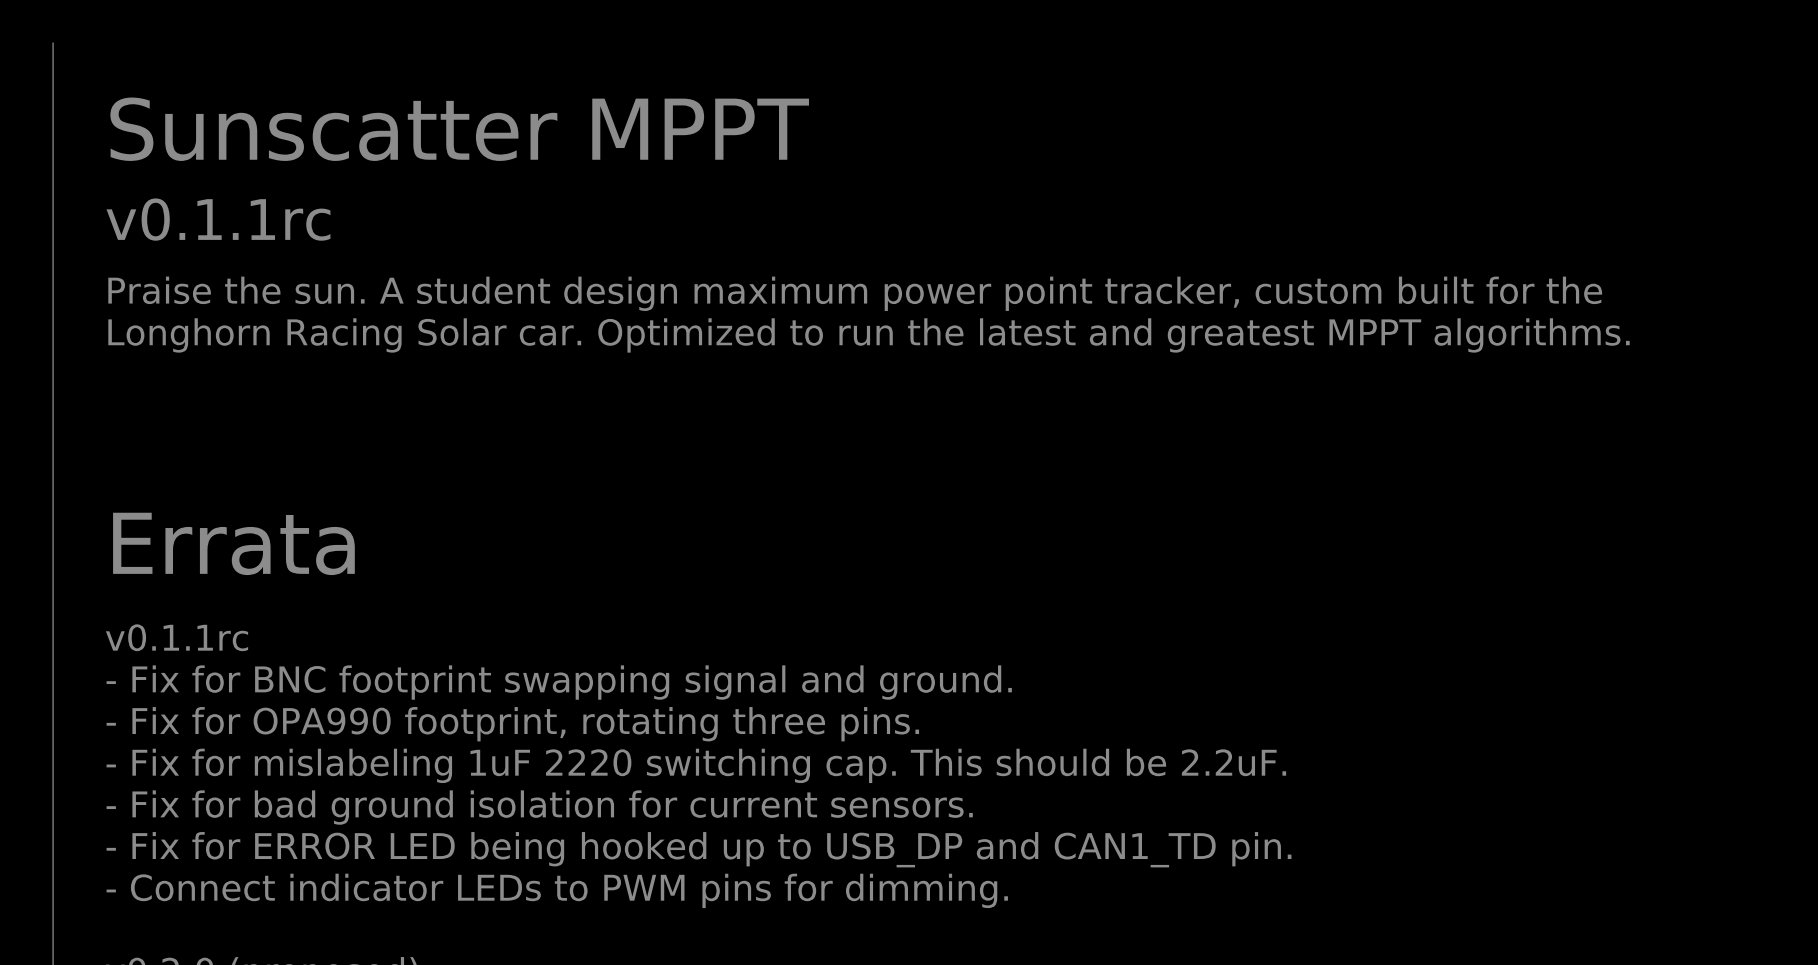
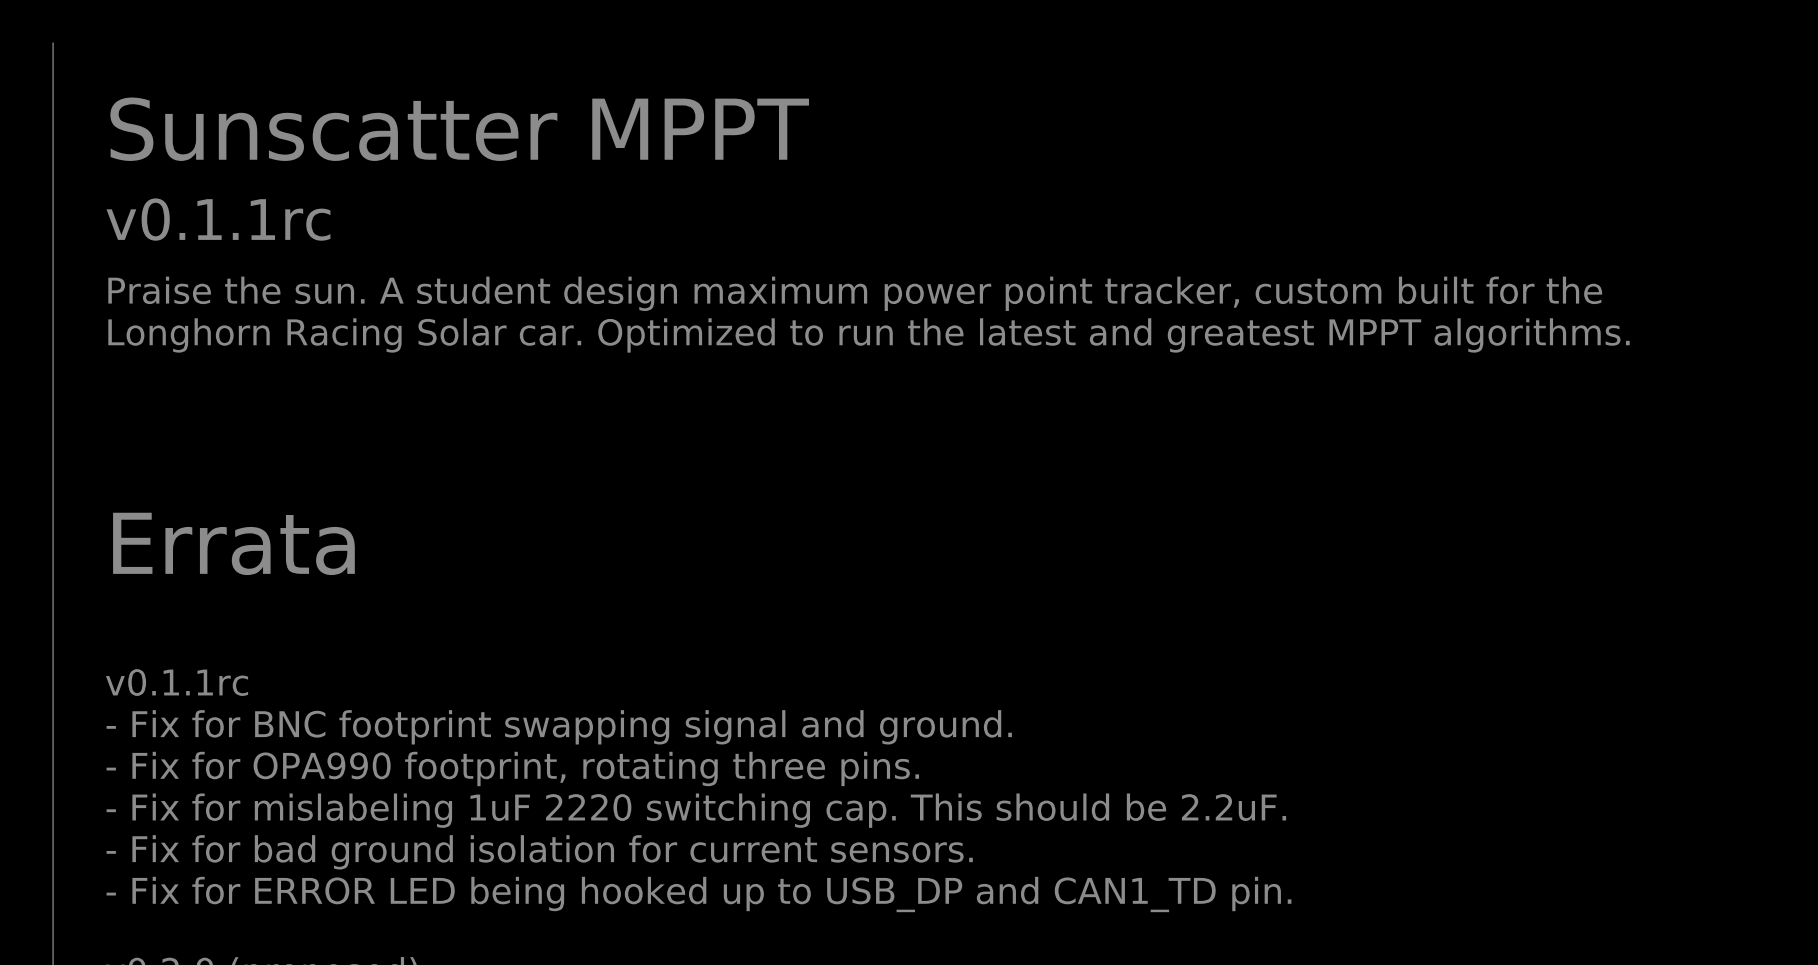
text position: v0.1.1rc (176, 637) -> v0.1.1rc (176, 682)
text position: - Fix for BNC footprint swapping signal and ground. (559, 682) -> - Fix for BNC footprint swapping signal and ground. (559, 727)
text position: - Fix for OPA990 footprint, rotating three pins. (512, 724) -> - Fix for OPA990 footprint, rotating three pins. (512, 768)
text position: - Fix for mislabeling 1uF 2220 switching cap. This should be 2.2uF. (696, 765) -> - Fix for mislabeling 1uF 2220 switching cap. This should be 2.2uF. (696, 810)
text position: - Fix for bad ground isolation for current sensors. (539, 807) -> - Fix for bad ground isolation for current sensors. (539, 852)
text position: - Fix for ERROR LED being hooked up to USB_DP and CAN1_TD pin. (698, 849) -> - Fix for ERROR LED being hooked up to USB_DP and CAN1_TD pin. (698, 894)
text: - Connect indicator LEDs to PWM pins for dimming. (557, 890) -> none

